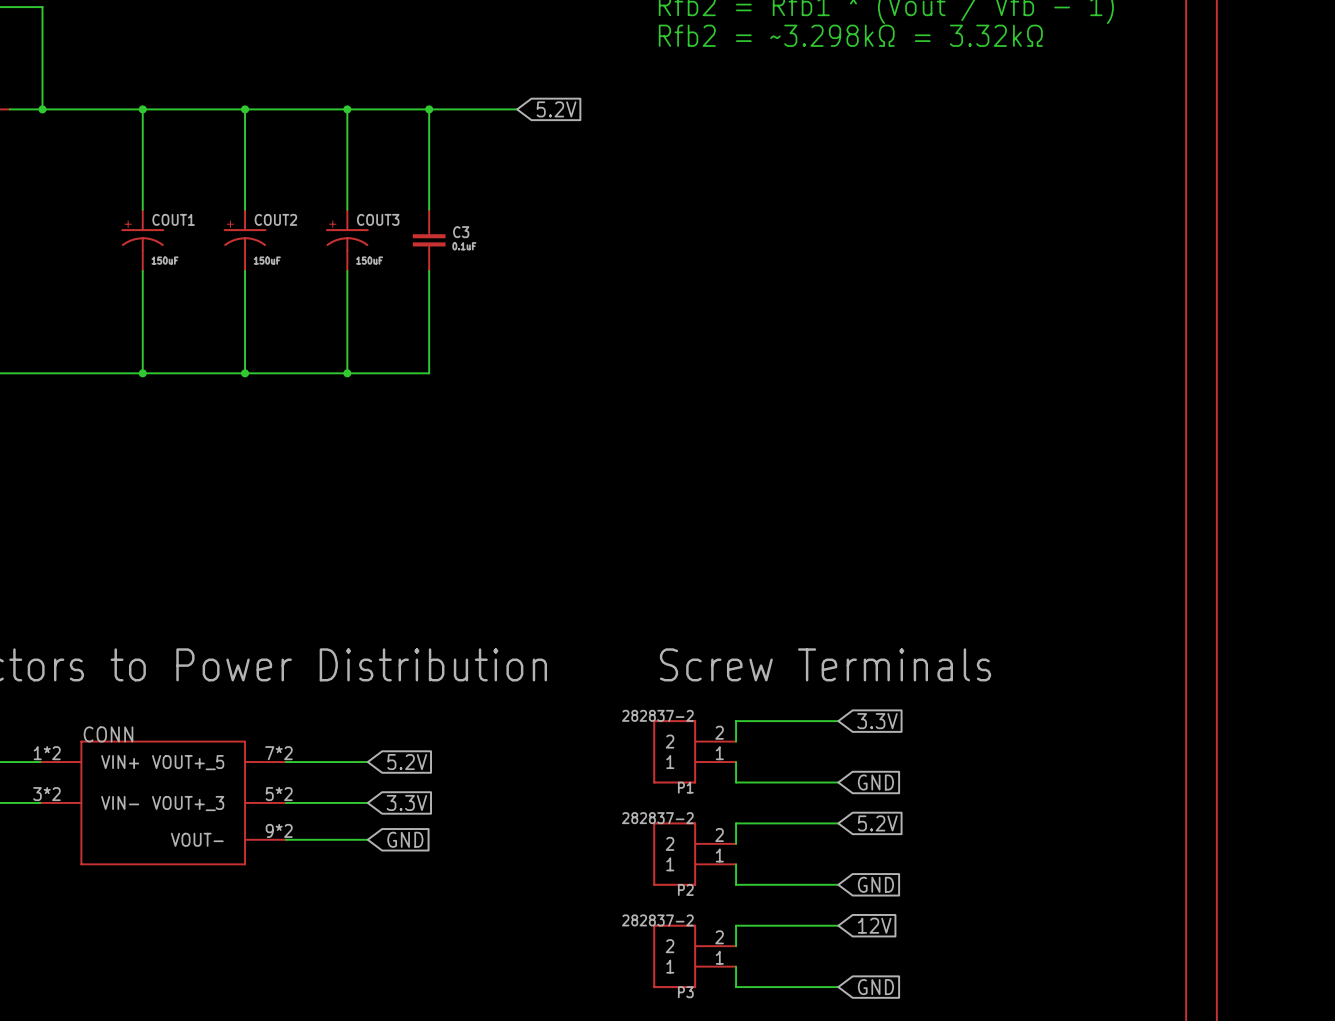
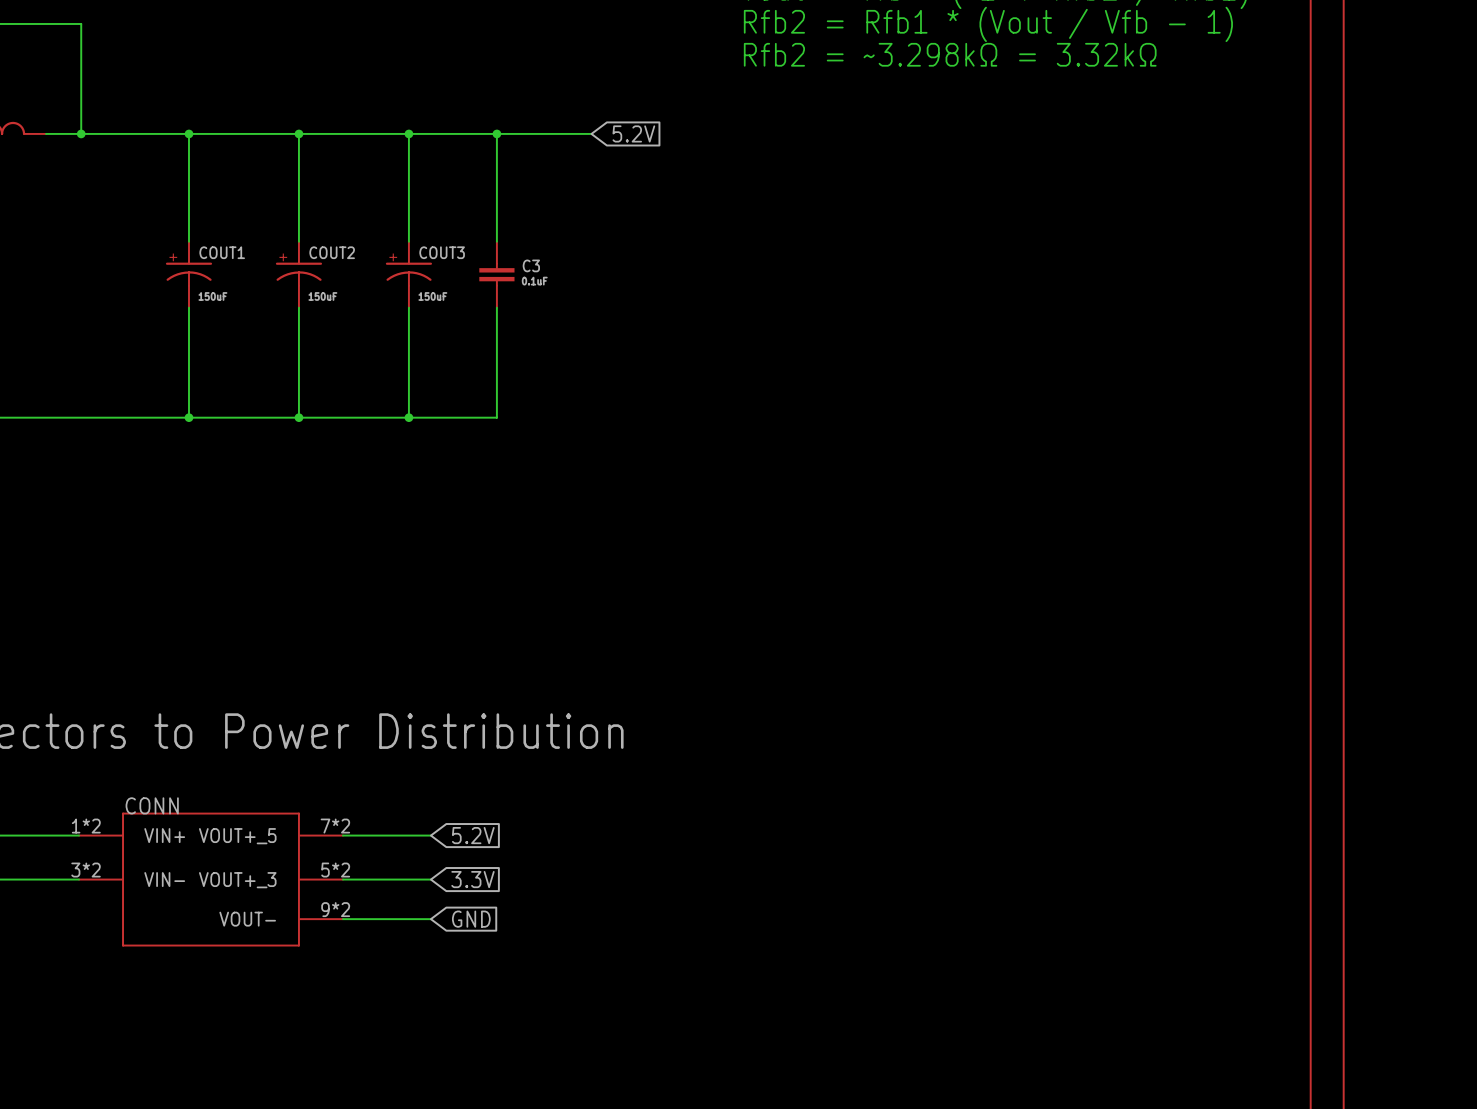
text: Screw Terminals (825, 664) -> none
wire: (838, 721) (736, 721) (736, 741) -> none
global label: 3.3V (877, 721) -> none
P1: 282837-2 (694, 751) -> none
wire: (736, 762) (736, 782) (838, 782) -> none
global label: GND (875, 782) -> none
wire: (838, 823) (736, 823) (736, 843) -> none
global label: 5.2V (877, 823) -> none
P2: 282837-2 (694, 854) -> none
wire: (736, 864) (736, 884) (838, 884) -> none
global label: GND (875, 884) -> none
wire: (838, 925) (736, 925) (736, 946) -> none
global label: 12V (874, 925) -> none
P3: 282837-2 (694, 956) -> none
wire: (736, 966) (736, 987) (838, 987) -> none
global label: GND (875, 987) -> none

